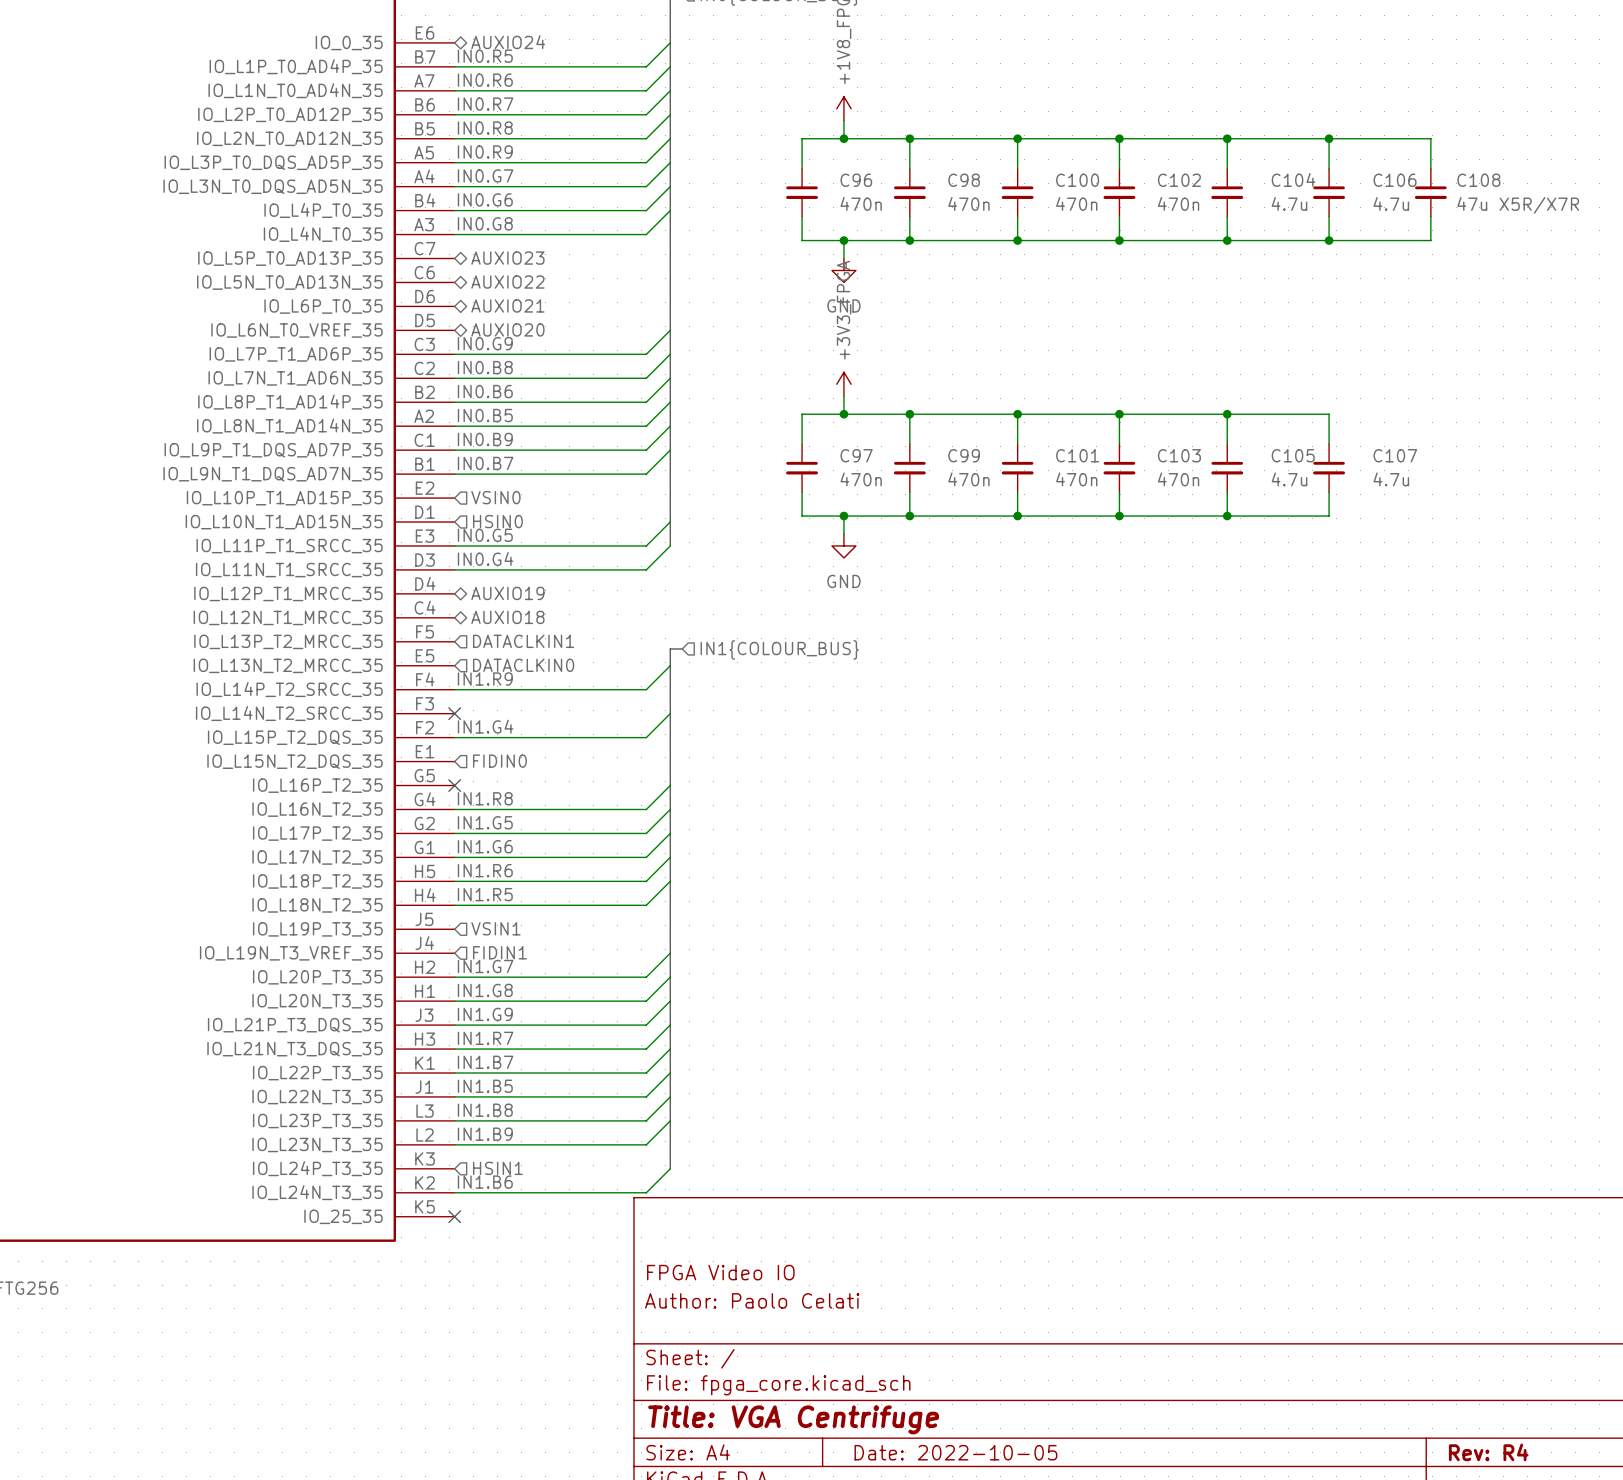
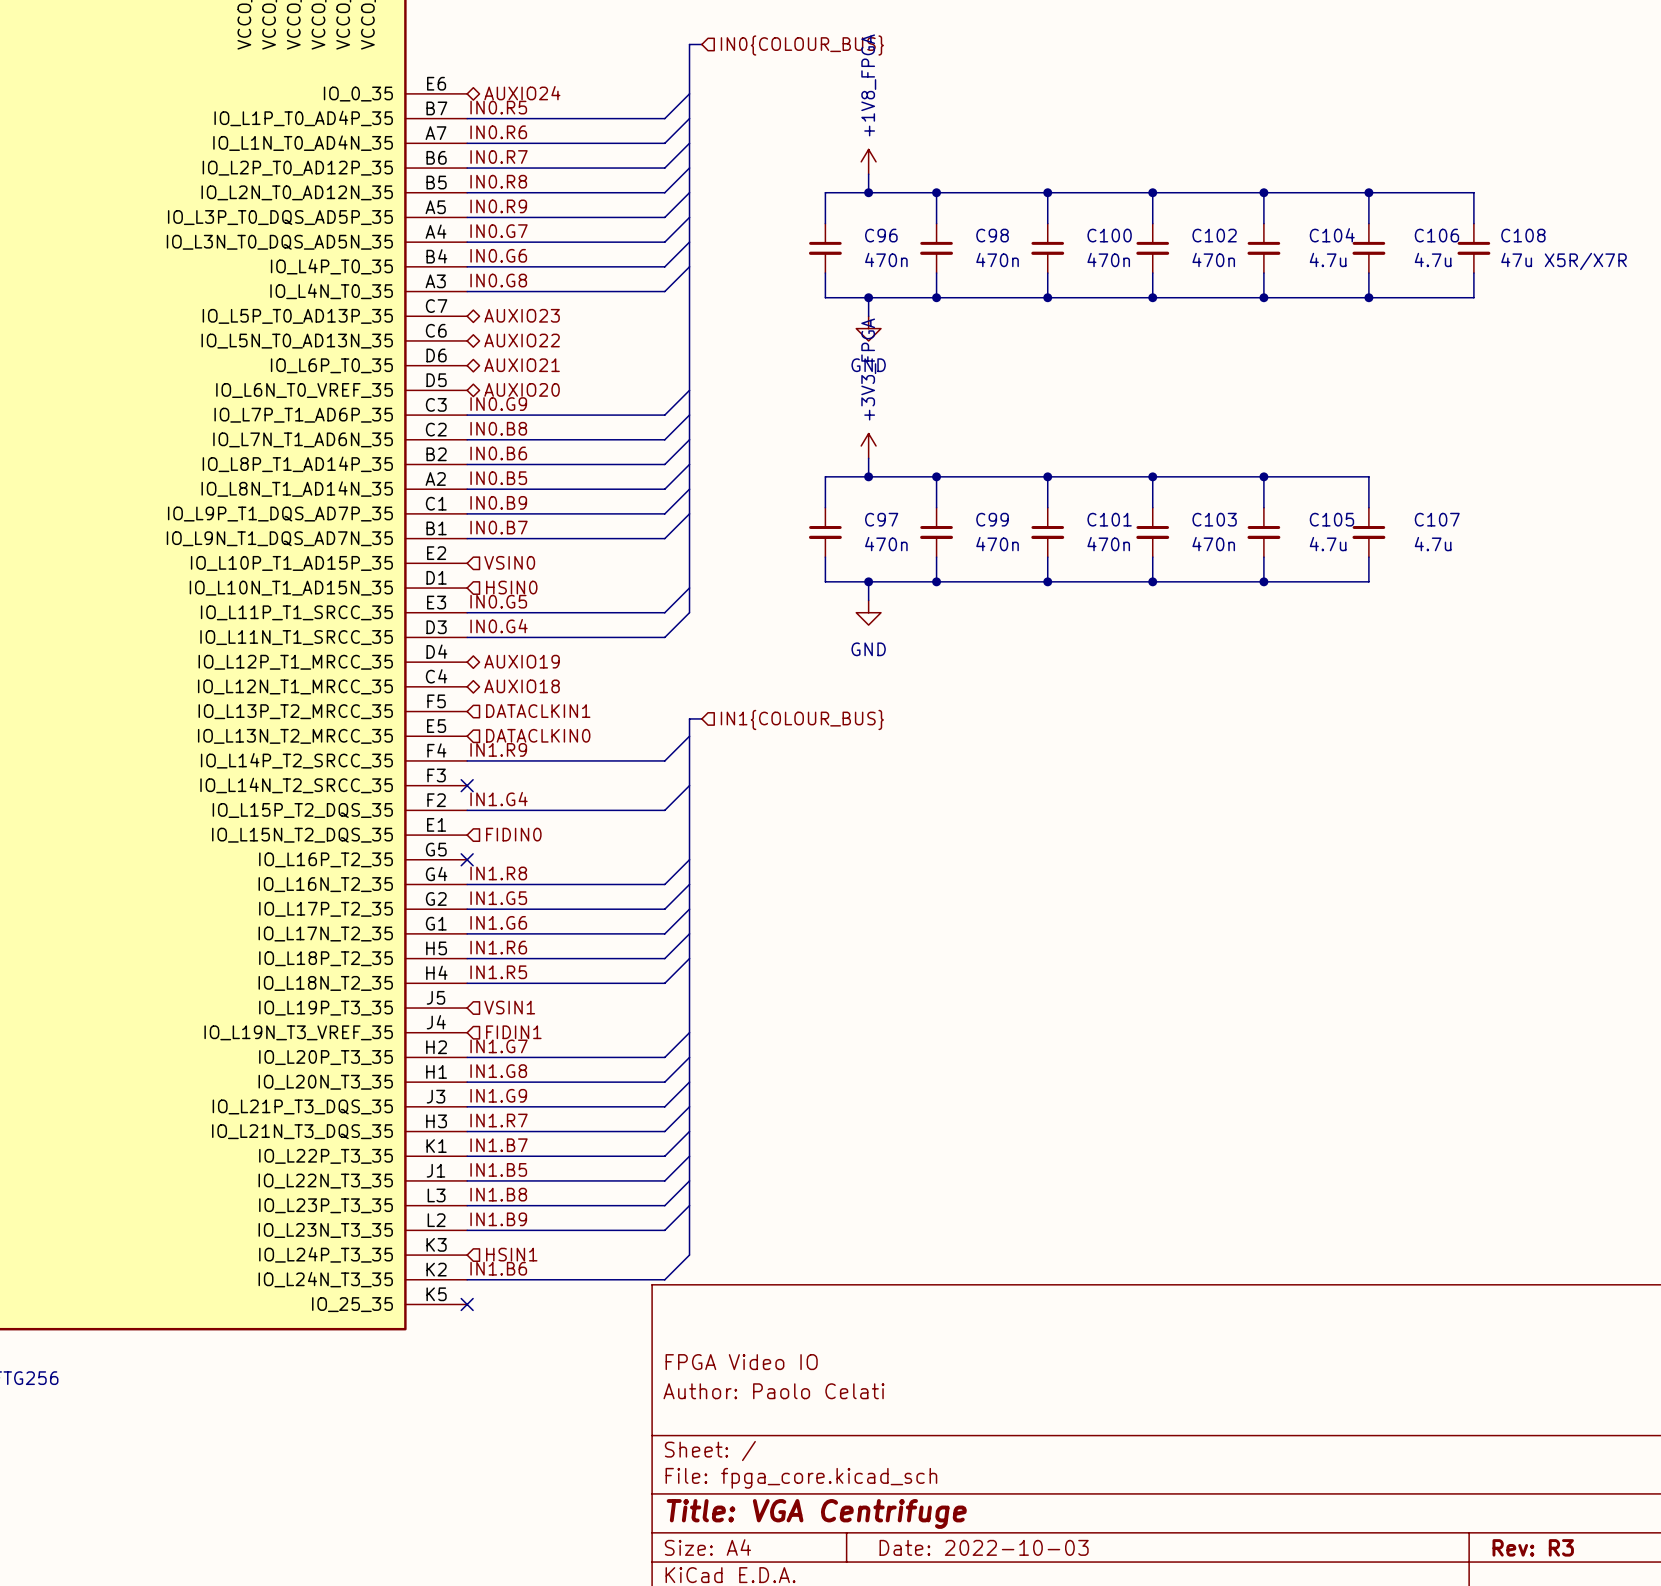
title block: Date: 2022-10-05 (955, 1452) -> Date: 2022-10-03 (984, 1547)
title block: Rev: R4 (1488, 1452) -> Rev: R3 (1533, 1547)

